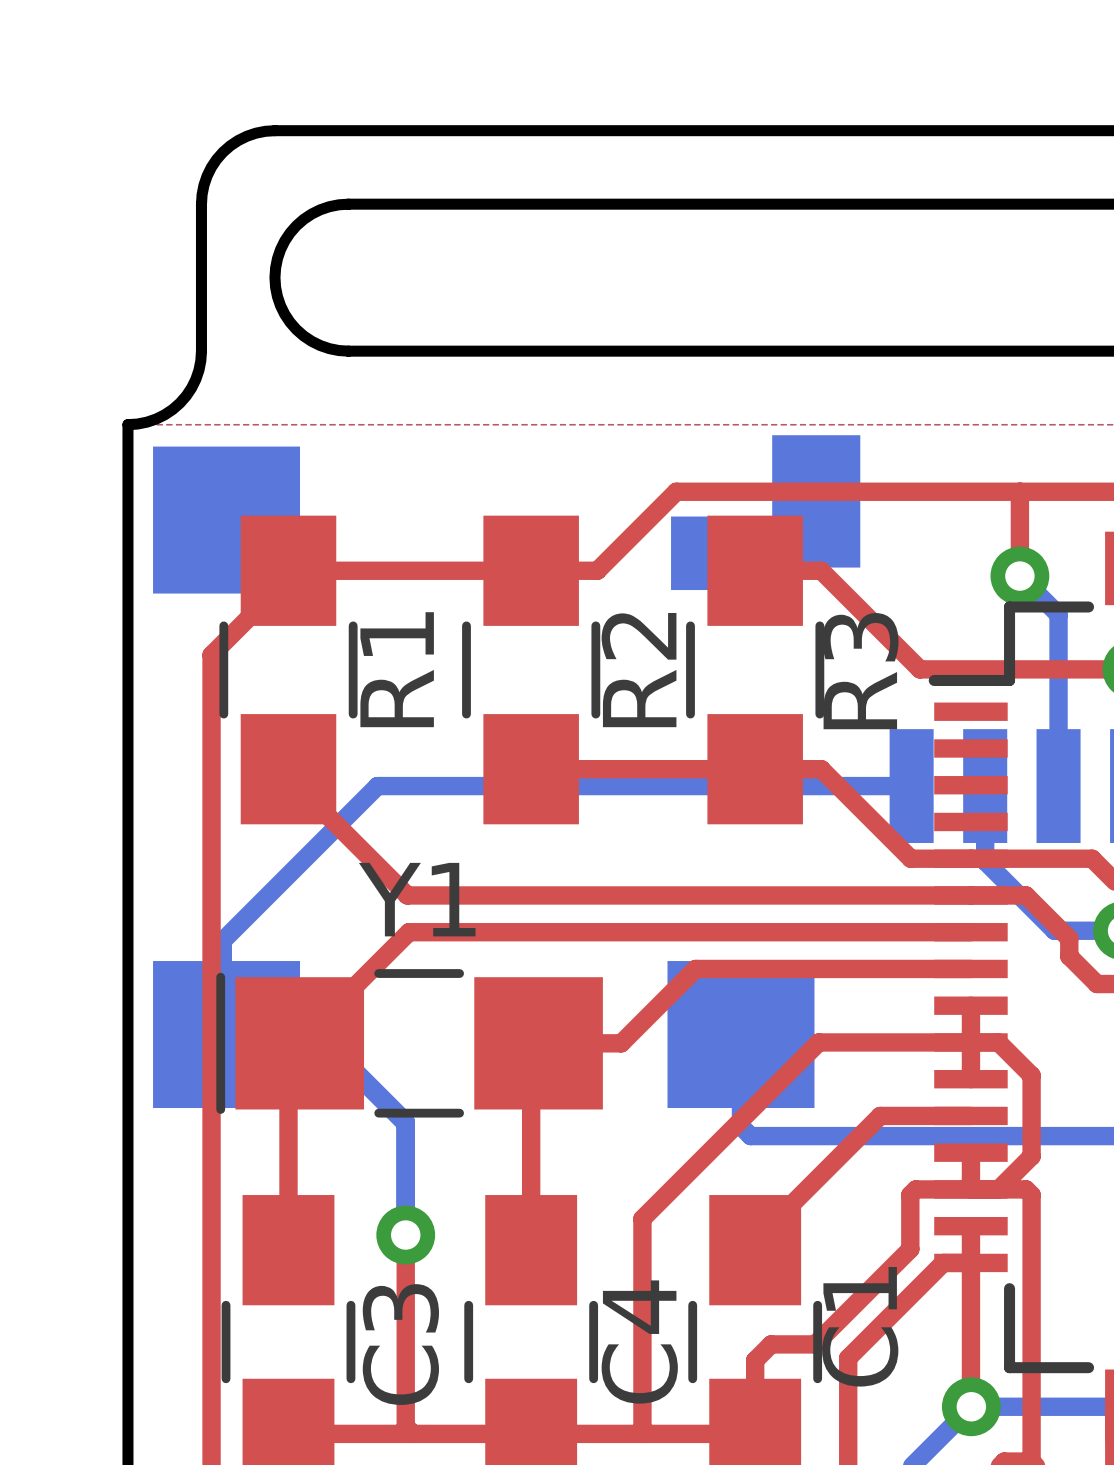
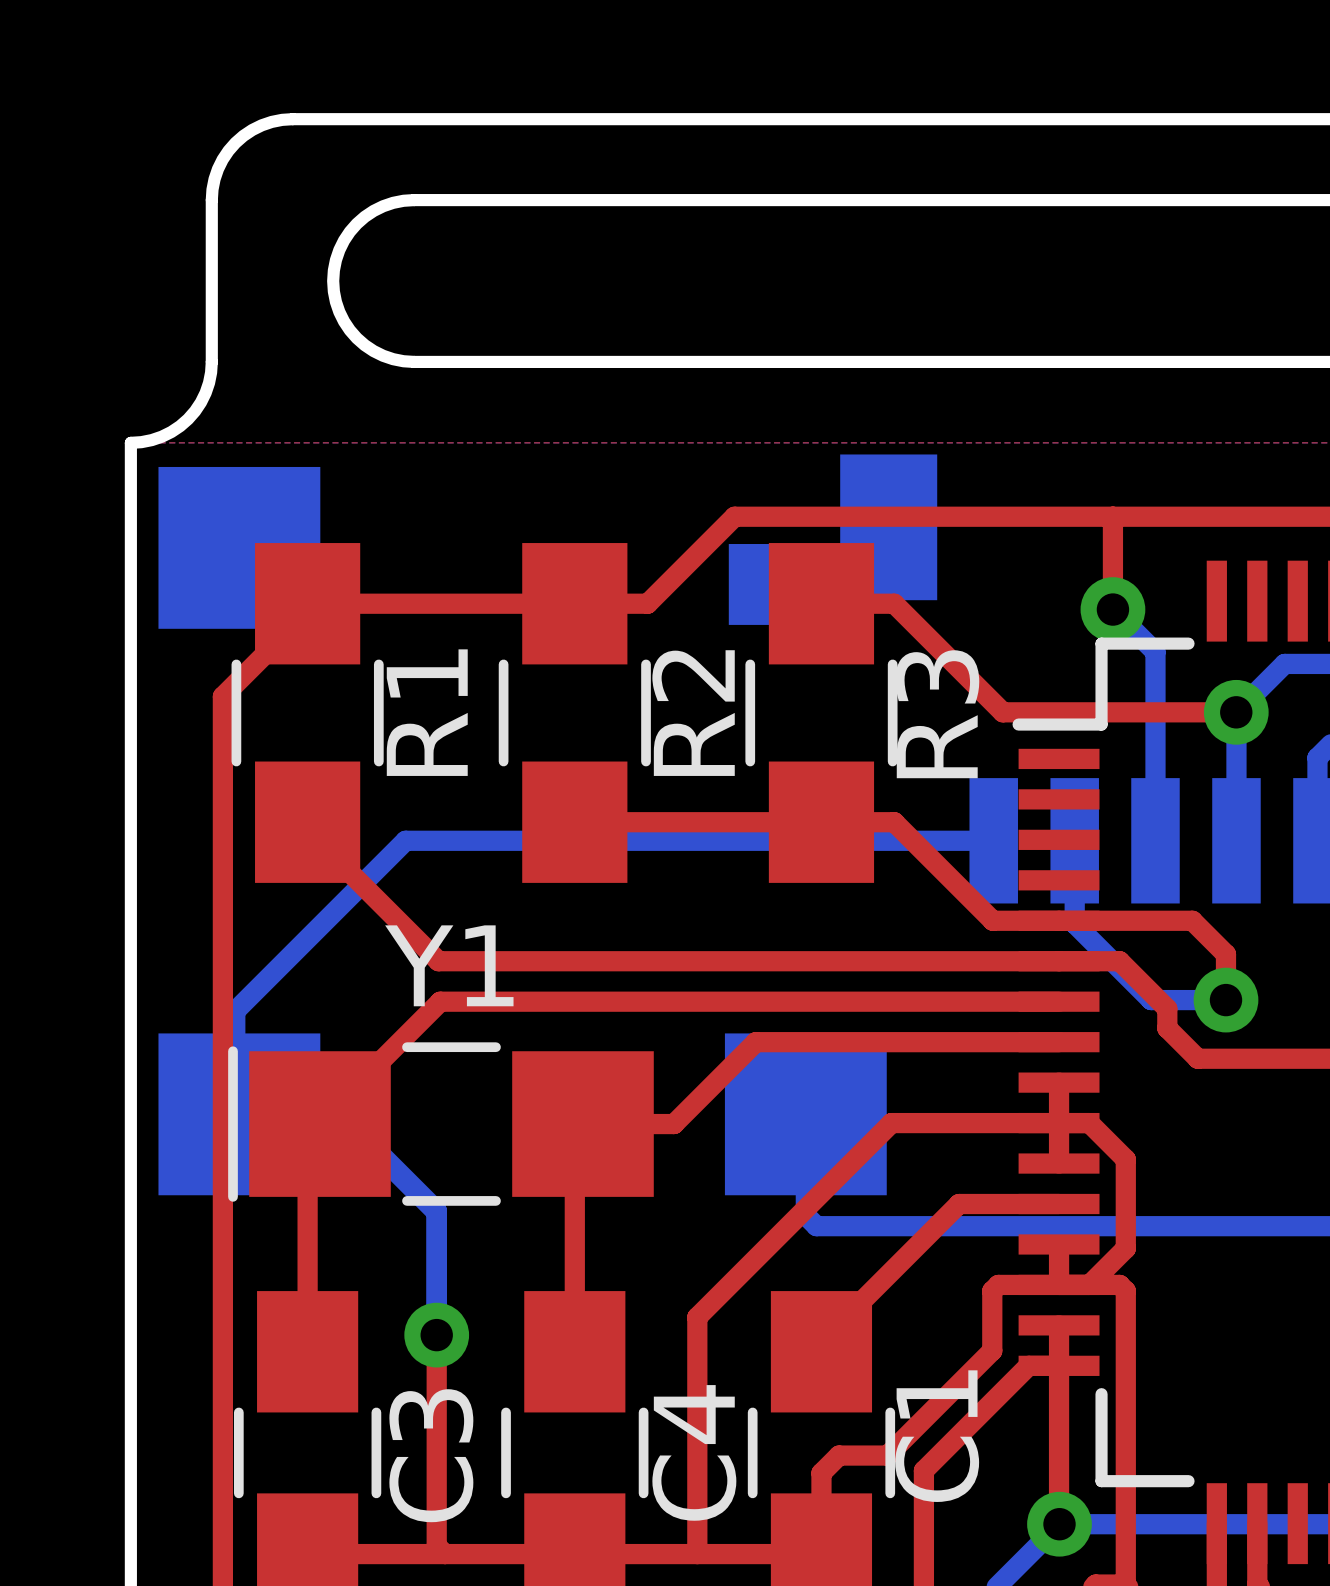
board edge: (385, 204) (338, 204) (311, 214) (296, 225) (284, 240) (277, 258) (274, 277) (277, 296) (284, 314) (296, 329) (311, 341) (338, 350) (385, 351) -> (414, 200) (383, 206) (356, 223) (339, 250) (333, 281) (339, 311) (356, 338) (383, 355) (414, 361)

